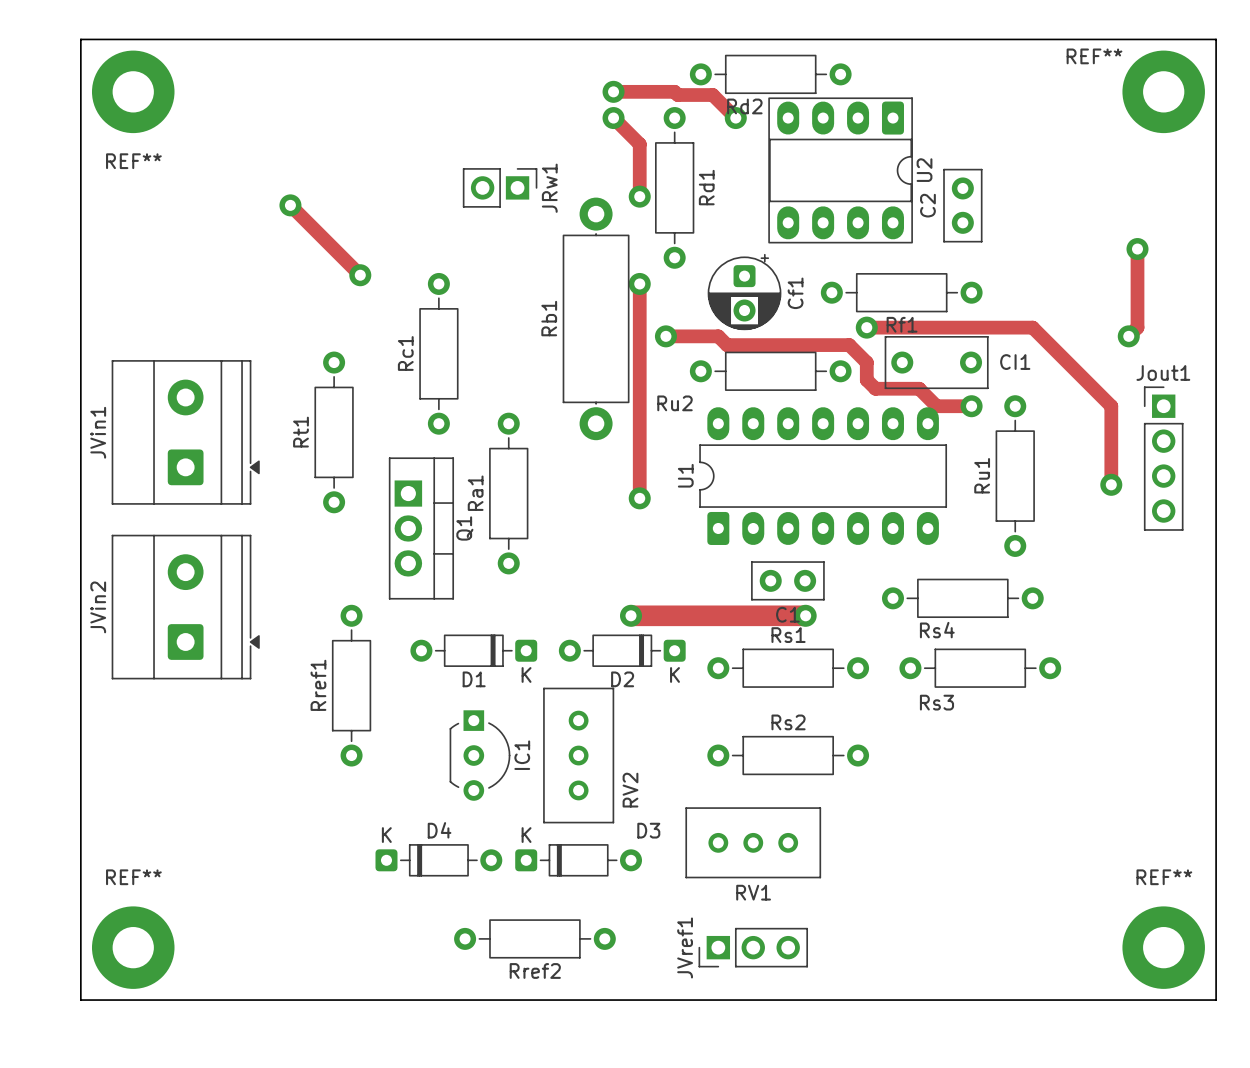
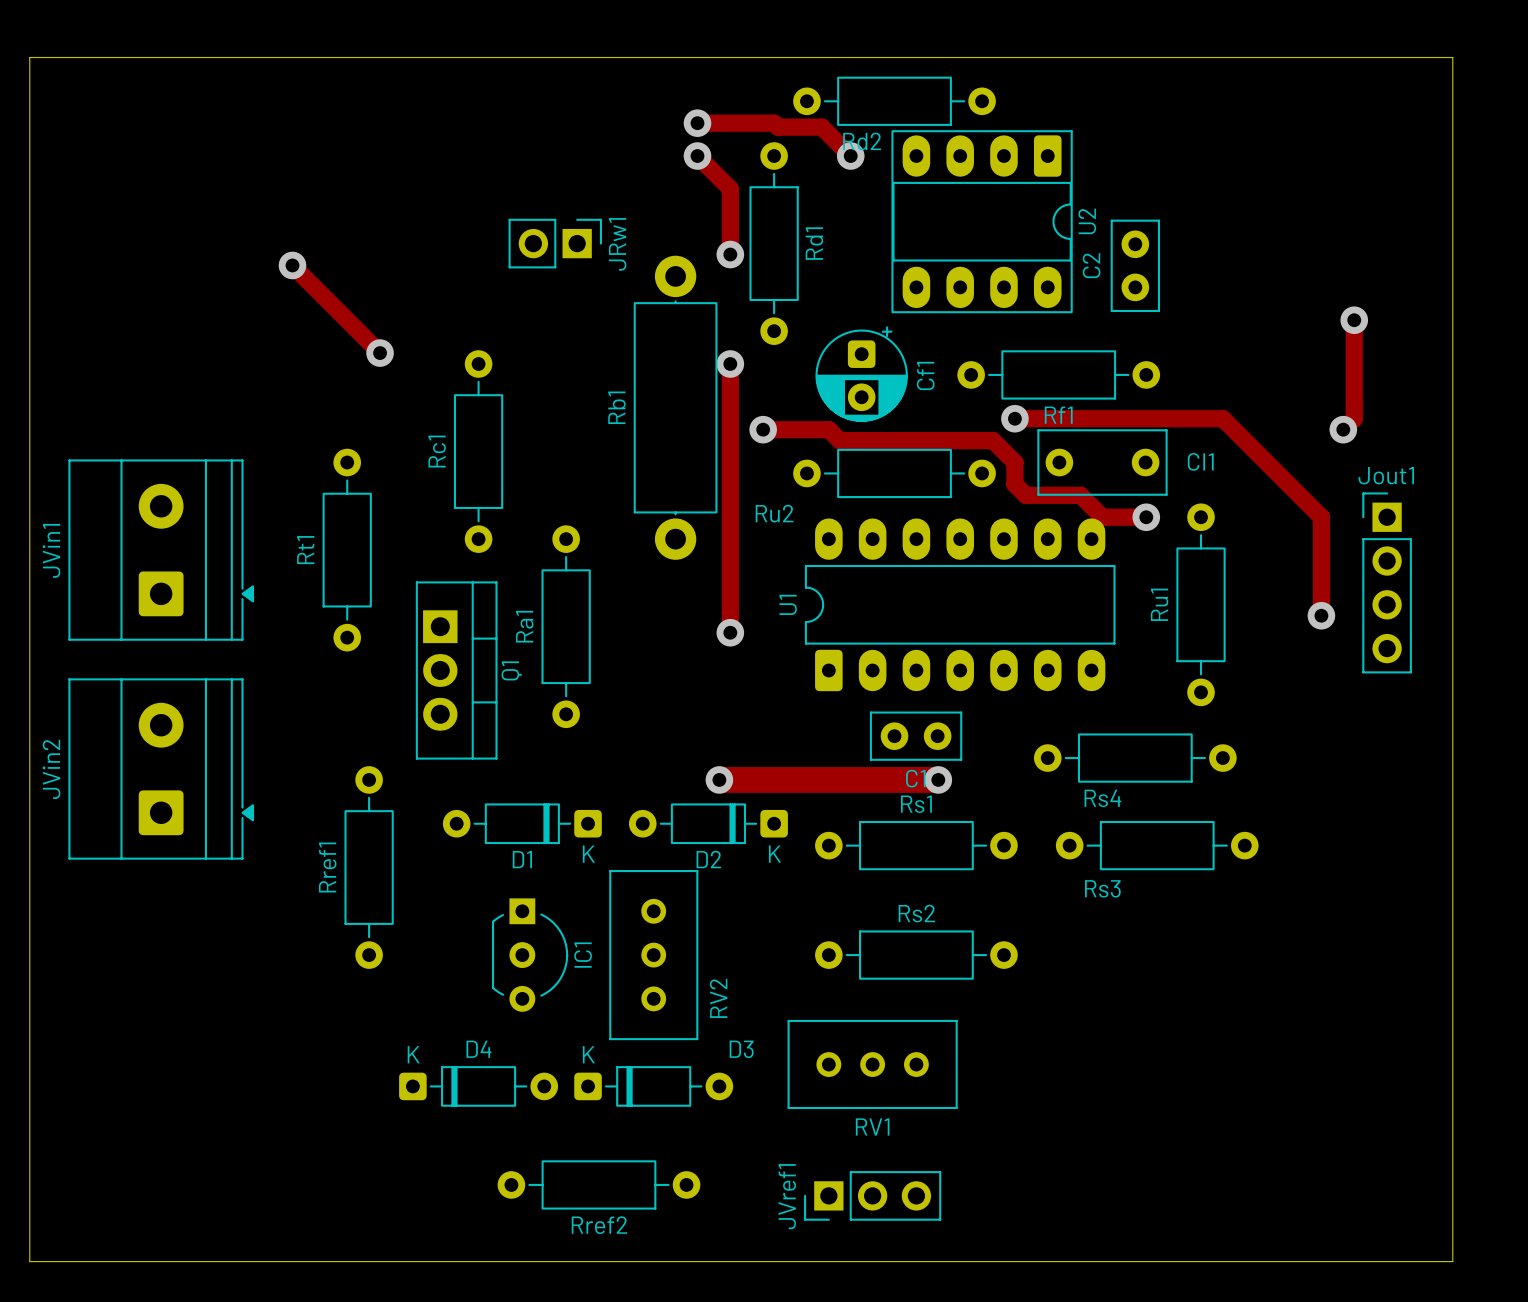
REF**: (133, 91) -> none
REF**: (1163, 91) -> none
REF**: (133, 947) -> none
REF**: (1163, 947) -> none

